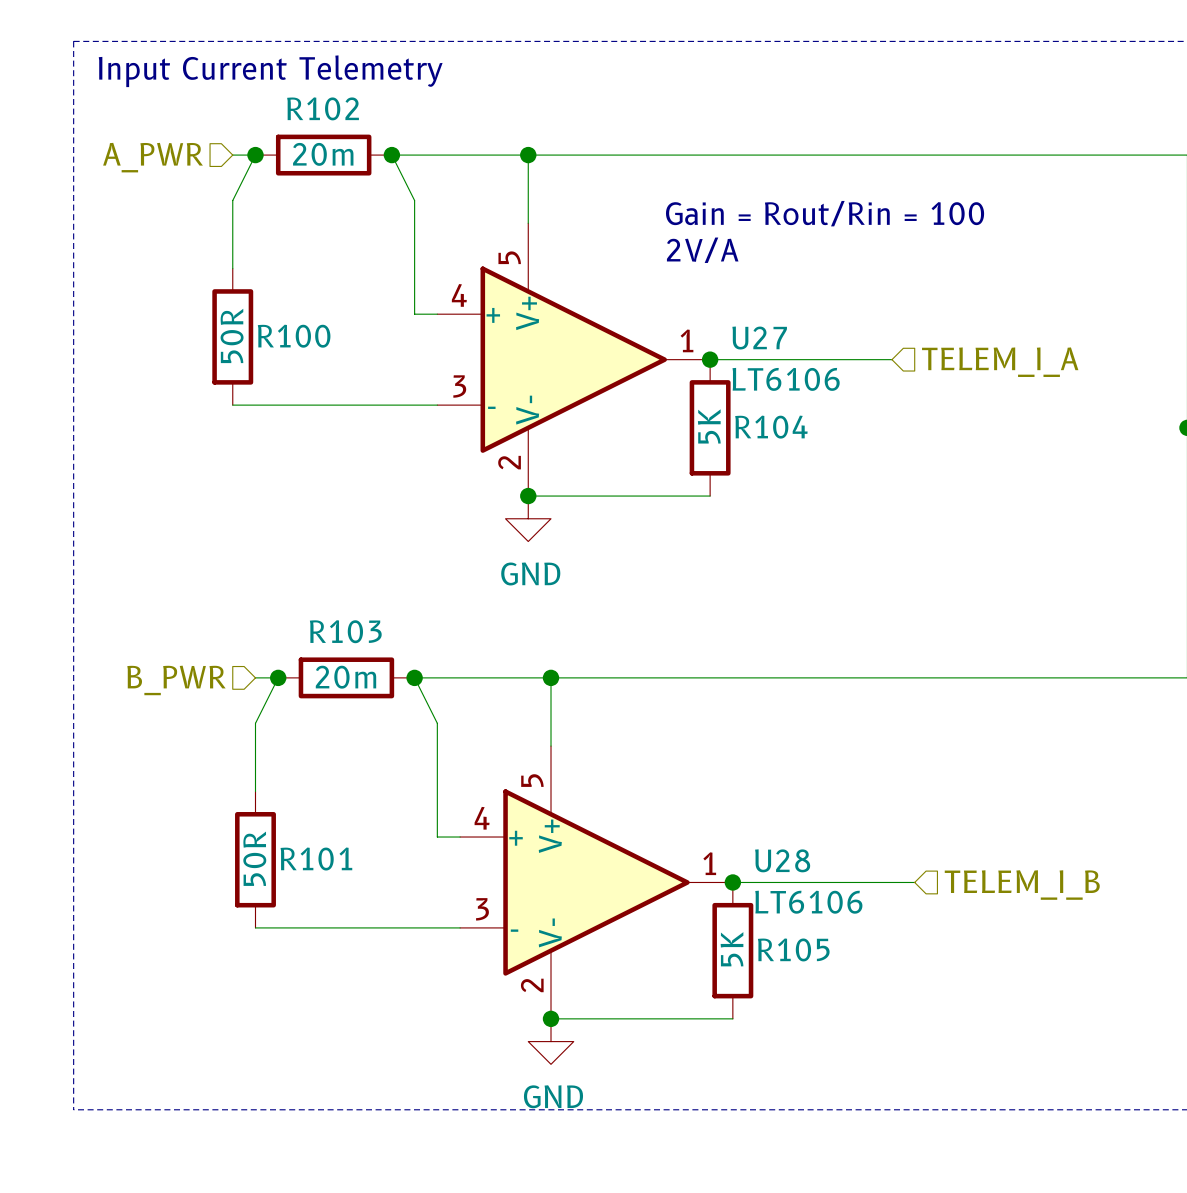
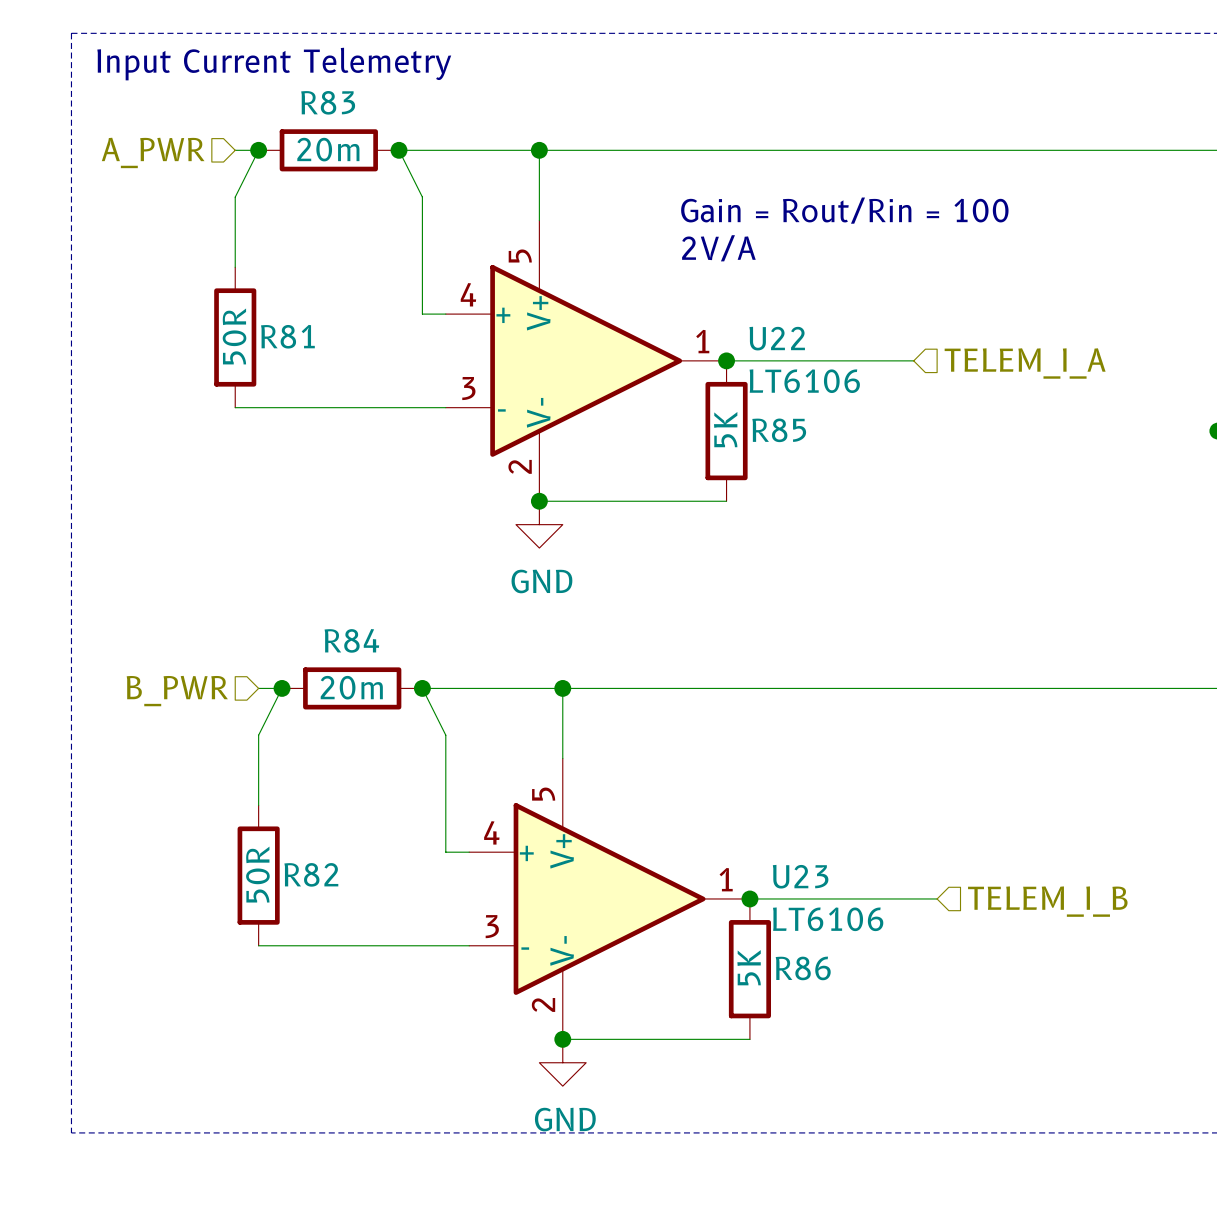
R102 name: R102 (323, 108) -> R83 (328, 102)
R100 name: R100 (294, 336) -> R81 (287, 336)
U27 name: U27 (759, 338) -> U22 (777, 338)
R104 name: R104 (771, 427) -> R85 (779, 430)
R103 name: R103 (345, 631) -> R84 (351, 640)
R101 name: R101 (316, 859) -> R82 (311, 874)
U28 name: U28 (782, 860) -> U23 (800, 876)
R105 name: R105 (793, 949) -> R86 (803, 968)

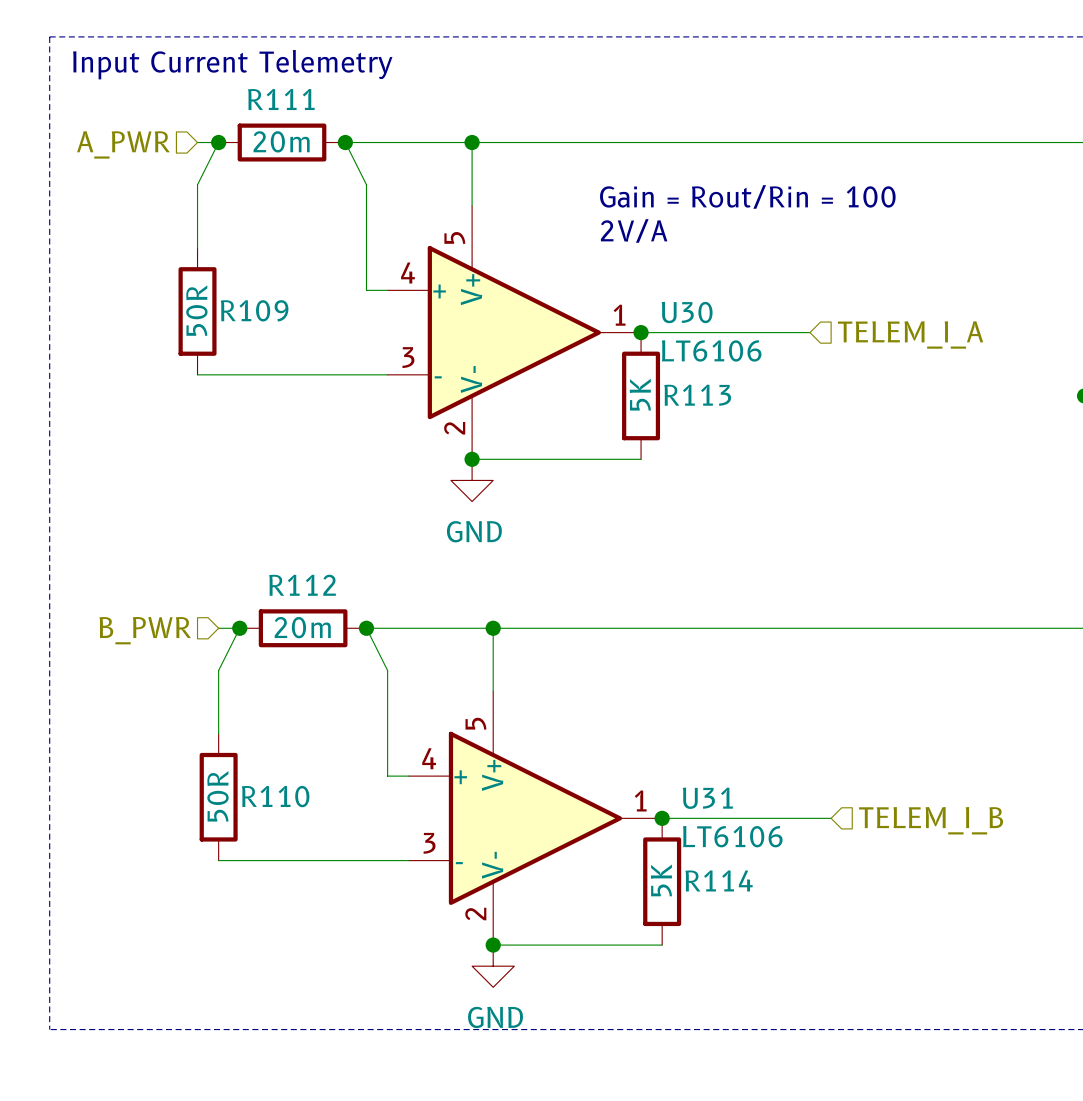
R83 name: R83 (328, 102) -> R111 (281, 99)
R81 name: R81 (287, 336) -> R109 (254, 310)
U22 name: U22 (777, 338) -> U30 (687, 312)
R85 name: R85 (779, 430) -> R113 (697, 395)
R84 name: R84 (351, 640) -> R112 (302, 585)
R82 name: R82 (311, 874) -> R110 (275, 796)
U23 name: U23 (800, 876) -> U31 (707, 798)
R86 name: R86 (803, 968) -> R114 (719, 880)

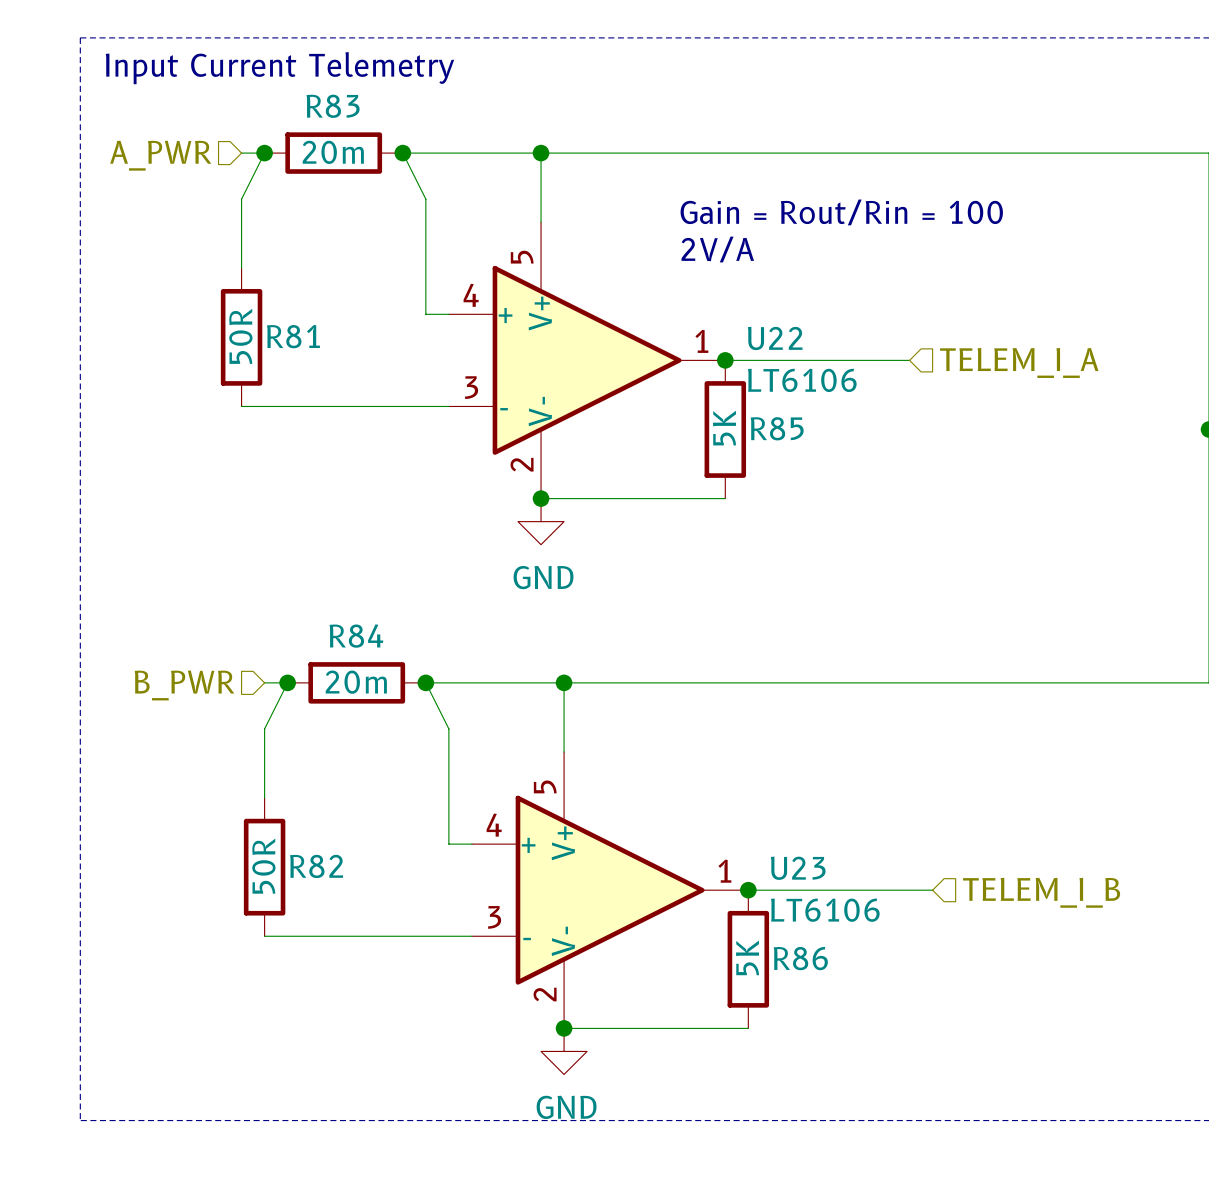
R111 name: R111 (281, 99) -> R83 (333, 106)
R109 name: R109 (254, 310) -> R81 (293, 336)
U30 name: U30 (687, 312) -> U22 (775, 338)
R113 name: R113 (697, 395) -> R85 (777, 428)
R112 name: R112 (302, 585) -> R84 (356, 636)
R110 name: R110 (275, 796) -> R82 (316, 866)
U31 name: U31 (707, 798) -> U23 (798, 868)
R114 name: R114 (719, 880) -> R86 (800, 958)

